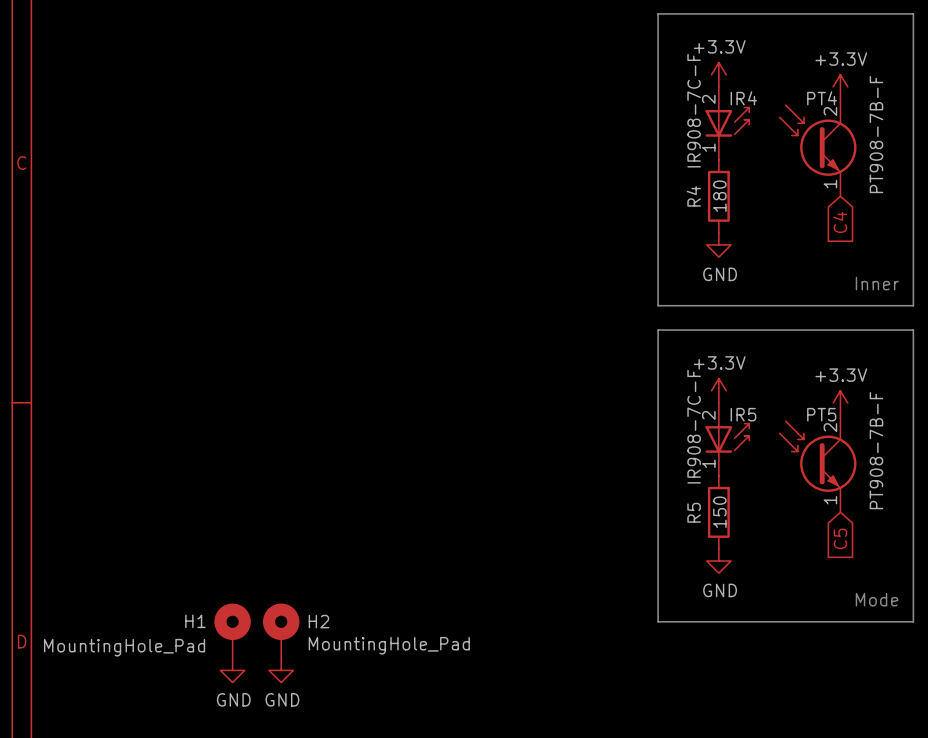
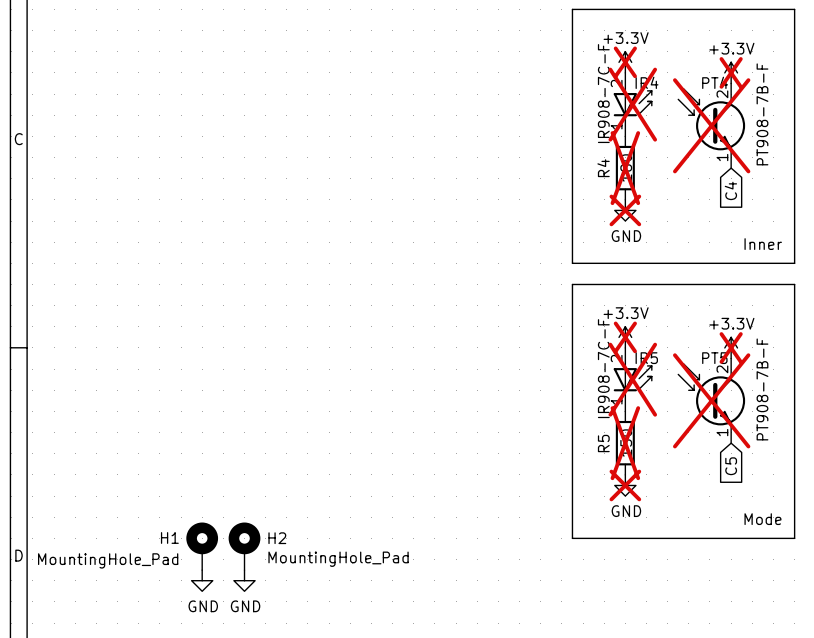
power symbol do-not-place cross: none -> (625, 62)
power symbol do-not-place cross: none -> (731, 72)
IR4 do-not-place cross: none -> (632, 104)
PT4 do-not-place cross: none -> (711, 125)
R4 do-not-place cross: none -> (625, 168)
power symbol do-not-place cross: none -> (625, 210)
power symbol do-not-place cross: none -> (625, 337)
power symbol do-not-place cross: none -> (731, 347)
IR5 do-not-place cross: none -> (632, 379)
PT5 do-not-place cross: none -> (711, 400)
R5 do-not-place cross: none -> (625, 443)
power symbol do-not-place cross: none -> (625, 485)

